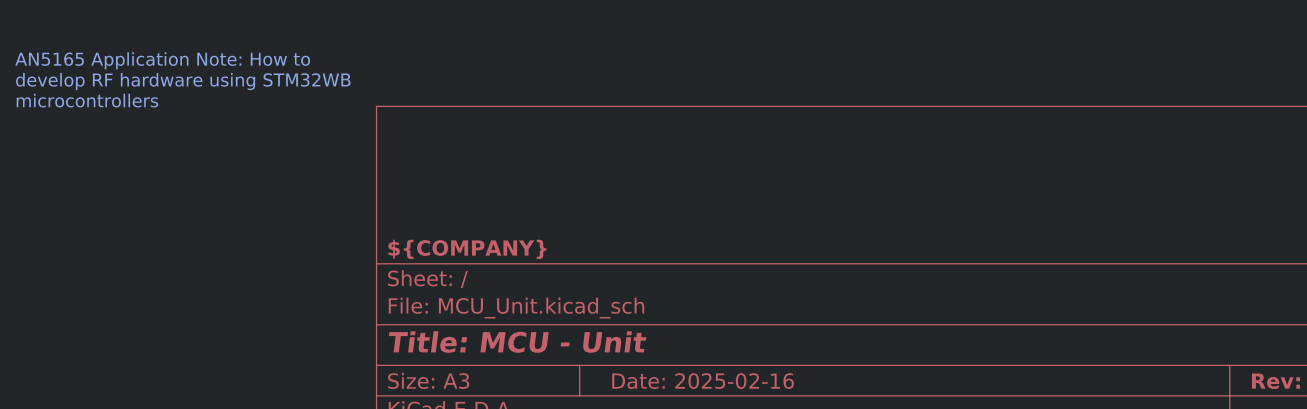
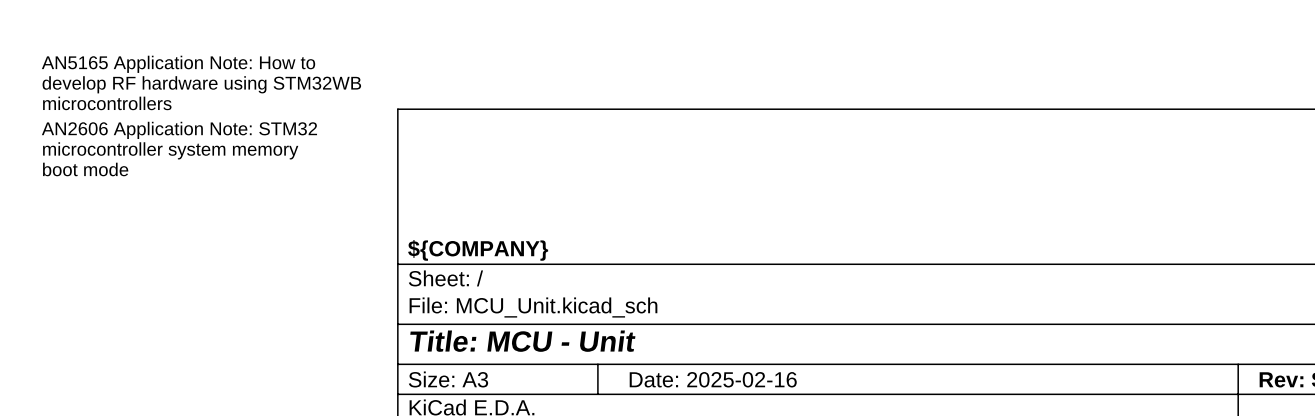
text: none -> AN2606 Application Note: STM32 (179, 130)
text: none -> microcontroller system memory (170, 150)
text: none -> boot mode (85, 169)

